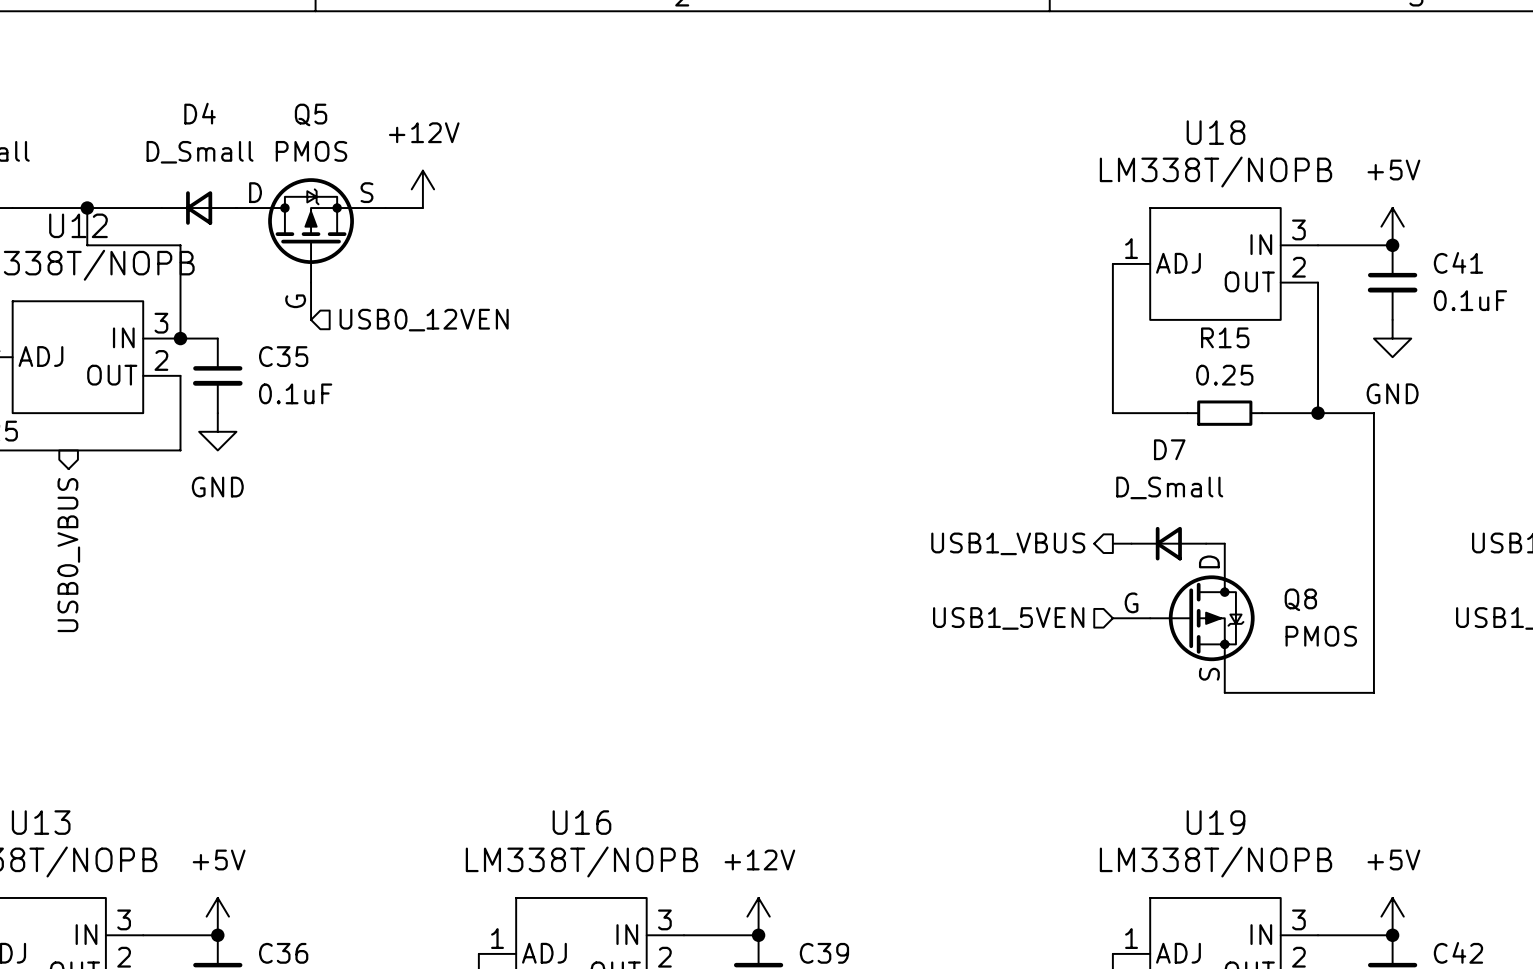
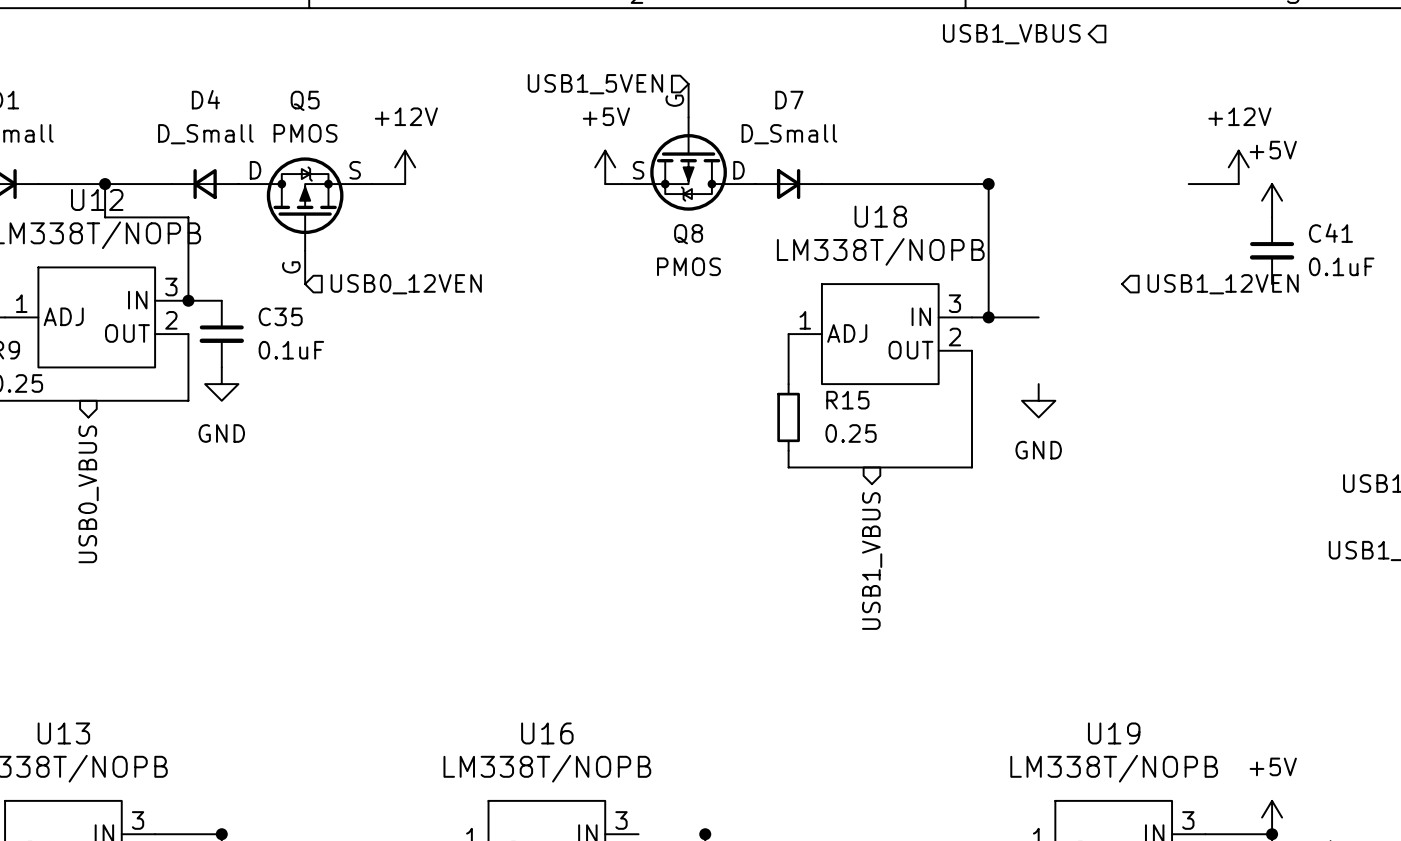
hierarchical label: none -> USB1_VBUS (1011, 34)
hierarchical label: none -> USB1_5VEN (595, 84)
power symbol: none -> +5V (605, 167)
power symbol: none -> +12V (1238, 167)
wire: none -> (605, 184) (621, 184)
wire: none -> (821, 184) (988, 184) (988, 317)
junction: none -> (988, 184)
wire: none -> (1188, 184) (1238, 184)
wire: (1318, 245) (1392, 245) -> (971, 317) (1038, 317)
junction: (1392, 245) -> none
wire: (1112, 263) (1112, 413) (1187, 413) -> none
U18 position: (1215, 263) -> (880, 334)
wire: (1318, 282) (1318, 413) -> none
hierarchical label: none -> USB1_12VEN (1223, 284)
power symbol position: GND (1392, 338) -> GND (1038, 400)
junction: none -> (988, 317)
wire: none -> (788, 334) (788, 384)
R15 value position: 0.25 (1224, 375) -> 0.25 (851, 433)
wire: none -> (971, 350) (971, 467) (788, 467) (788, 450)
R15 rotation: 0° (1224, 413) -> 90° clockwise (788, 417)
R15 position: (1224, 413) -> (788, 417)
wire: (1262, 413) (1373, 413) (1373, 692) (1224, 692) -> none
junction: (1318, 413) -> none
hierarchical label rotation: 0° (1008, 543) -> 90° counterclockwise (872, 561)
wire: (1112, 543) (1131, 543) -> none
D7 rotation: 0° (1168, 543) -> 180° (788, 184)
D7 position: (1168, 543) -> (788, 184)
wire: (1206, 543) (1224, 543) -> none
Q8 name position: Q8 (1300, 599) -> Q8 (688, 234)
hierarchical label: USB1_5VEN (1008, 618) -> none
Q8 position: (1183, 618) -> (688, 147)
Q8 rotation: 0° (1202, 618) -> 90° clockwise (688, 164)
power symbol: +5V (217, 916) -> none
power symbol: +12V (758, 916) -> none
wire: (683, 935) (758, 935) -> none

